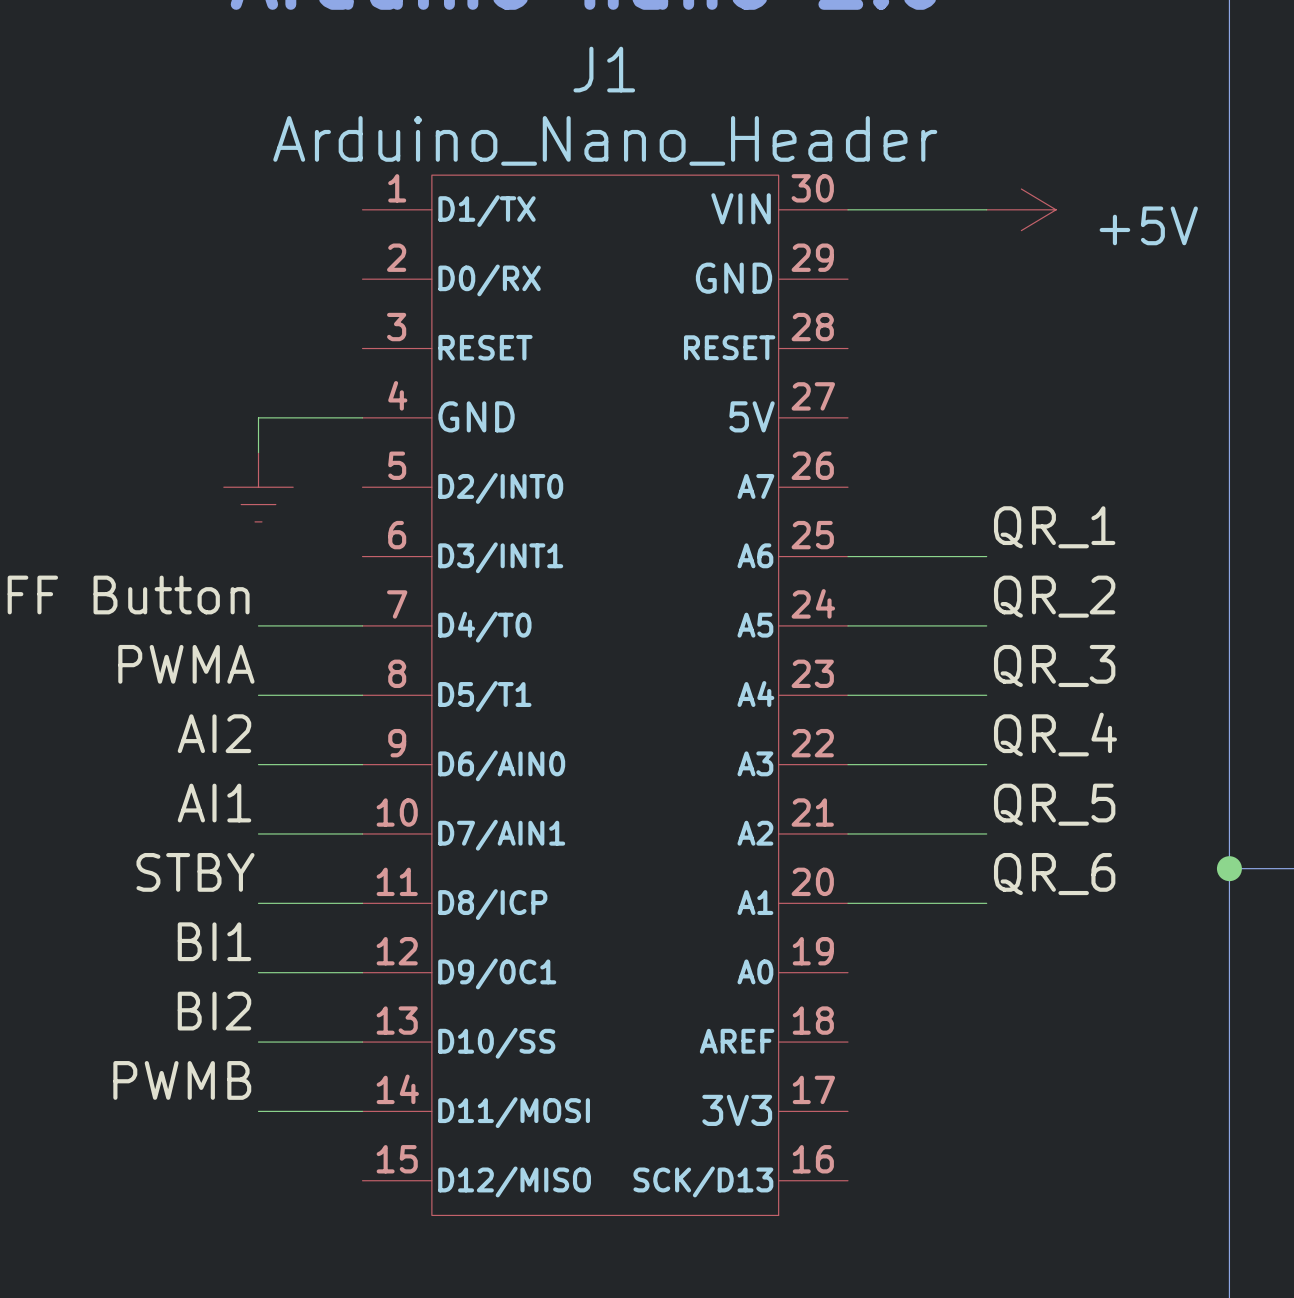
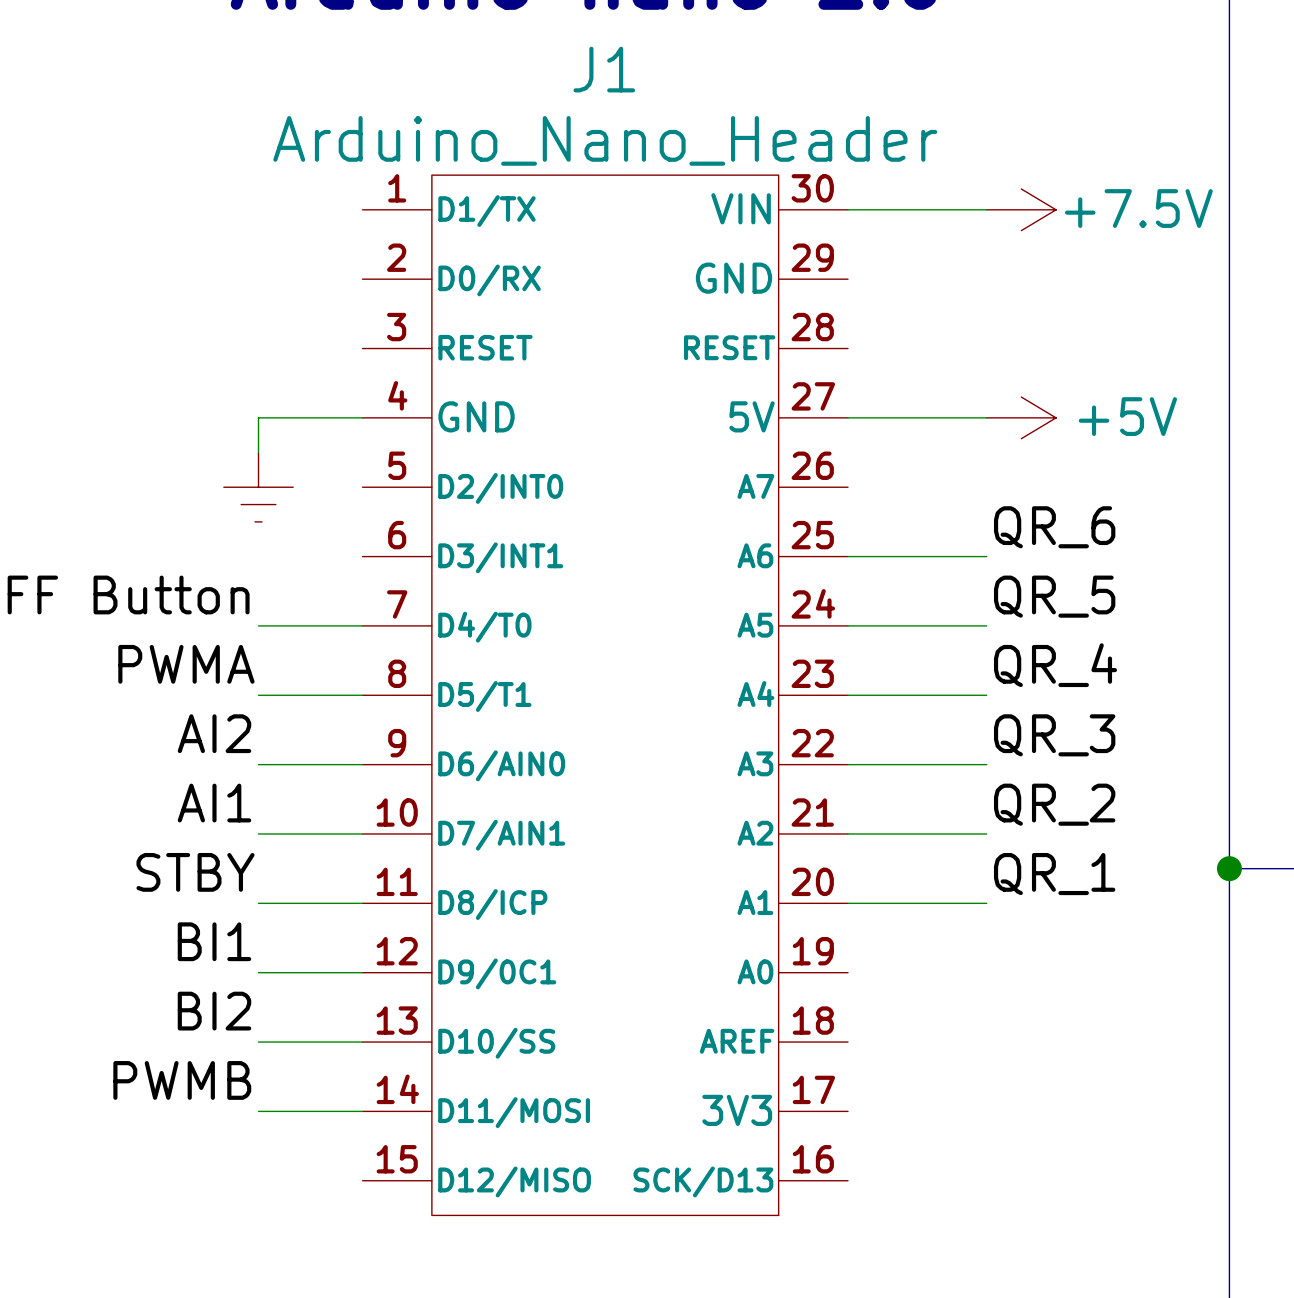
power symbol: +5V (1021, 209) -> +7.5V (1021, 209)
wire: none -> (847, 417) (986, 417)
power symbol: none -> +5V (1021, 417)
label: QR_1 (1054, 527) -> QR_6 (1054, 527)
label: QR_2 (1054, 596) -> QR_5 (1054, 596)
label: QR_3 (1054, 665) -> QR_4 (1055, 665)
label: QR_4 (1055, 734) -> QR_3 (1054, 735)
label: QR_5 (1054, 804) -> QR_2 (1054, 804)
label: QR_6 (1054, 874) -> QR_1 (1054, 874)

